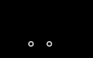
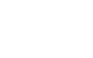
via: (30, 43) -> none
via: (49, 43) -> none

